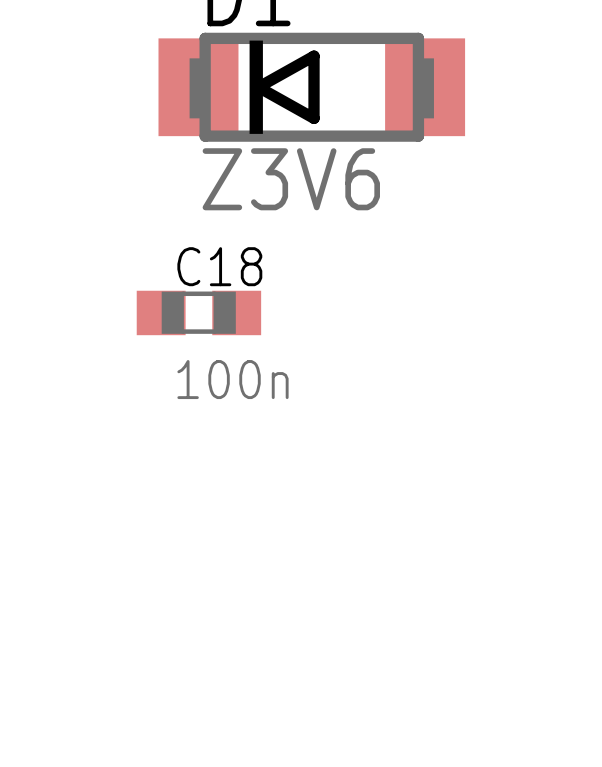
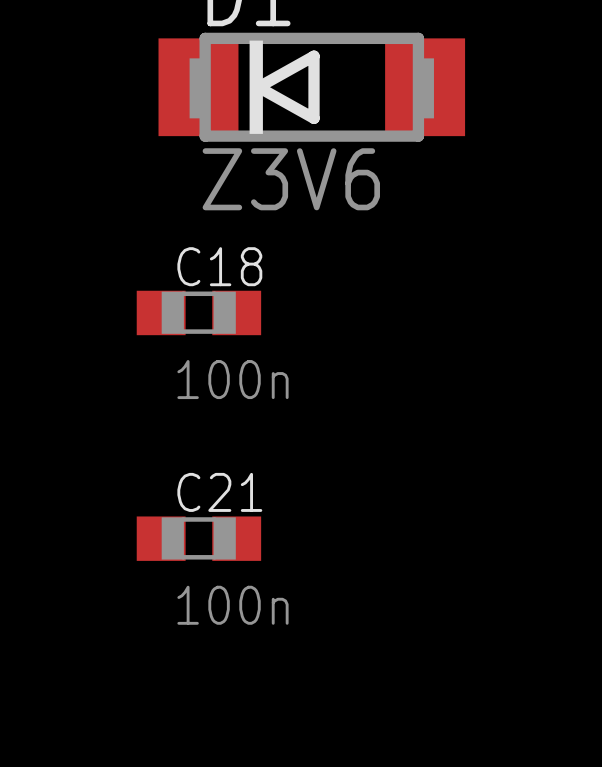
C21: none -> 100n (198, 538)

